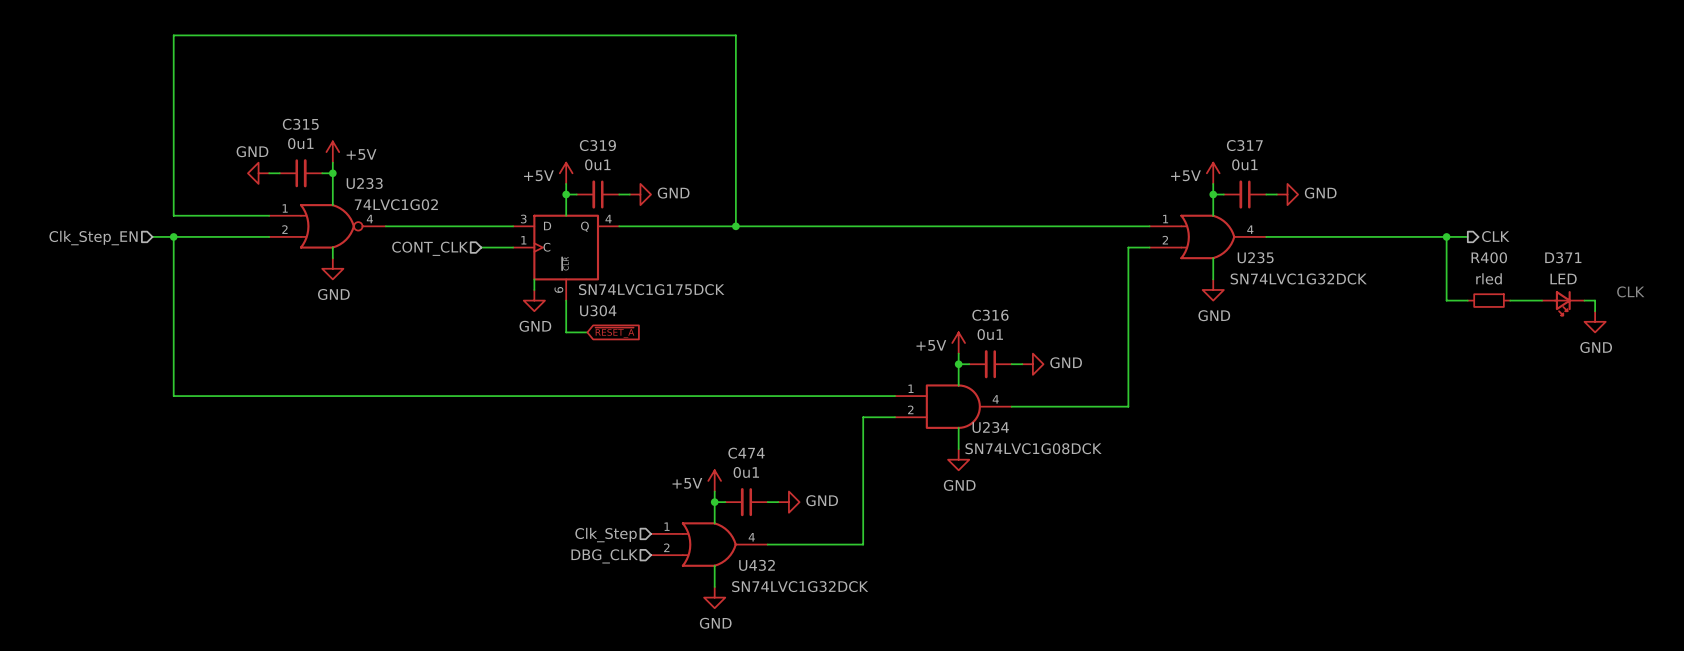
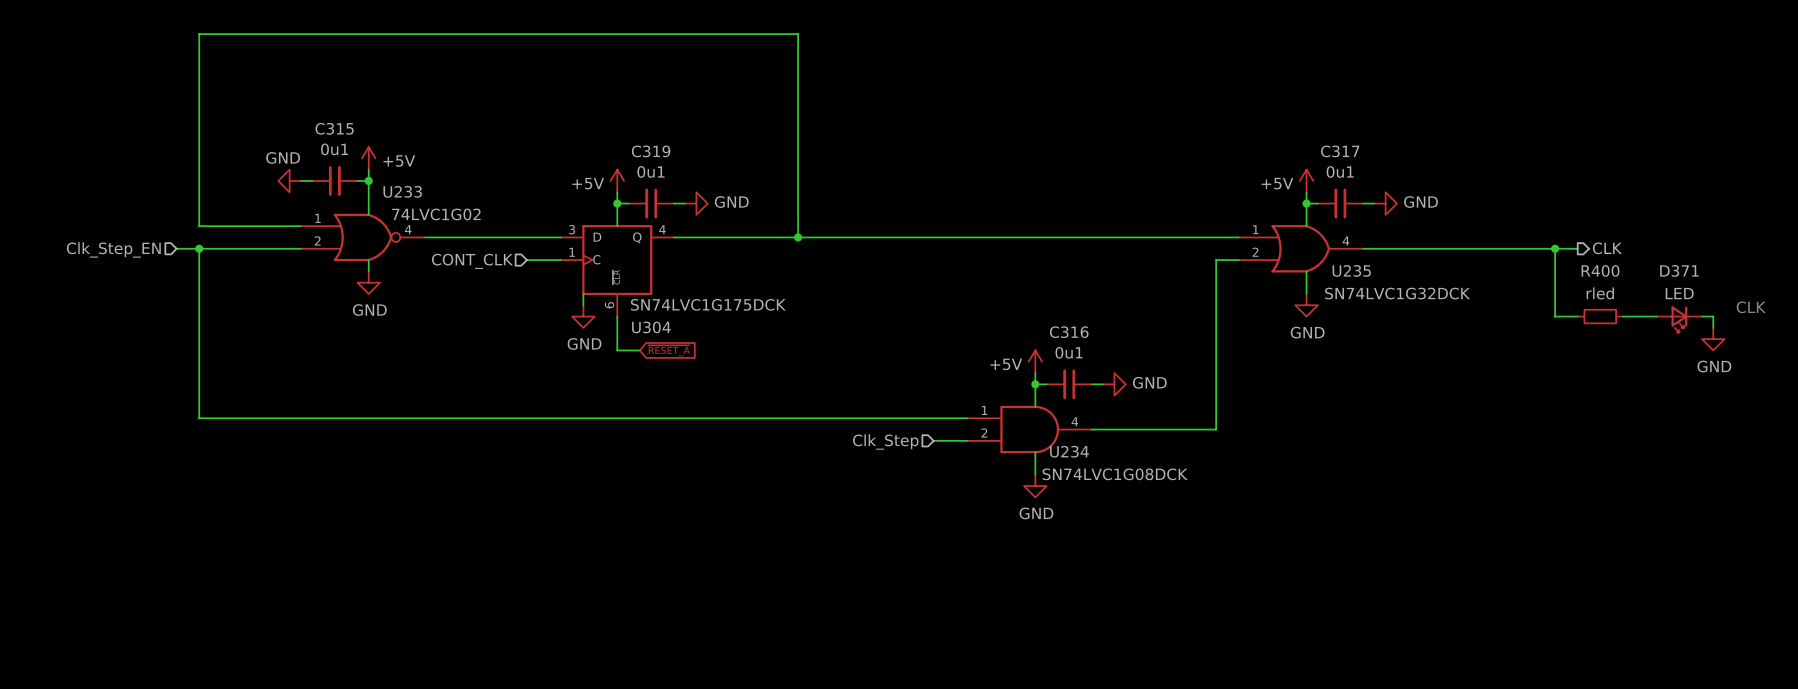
wire: (863, 417) (863, 544) (767, 544) -> none
hierarchical label: none -> Clk_Step (885, 442)
power symbol: +5V (714, 480) -> none
wire: (714, 491) (714, 523) -> none
wire: (714, 502) (725, 502) -> none
junction: (714, 502) -> none
C474: 0u1 (746, 502) -> none
wire: (767, 502) (778, 502) -> none
power symbol: GND (788, 502) -> none
hierarchical label: Clk_Step (606, 535) -> none
U432: SN74LVC1G32DCK (709, 544) -> none
hierarchical label: DBG_CLK (604, 556) -> none
wire: (714, 565) (714, 586) -> none
power symbol: GND (714, 597) -> none

